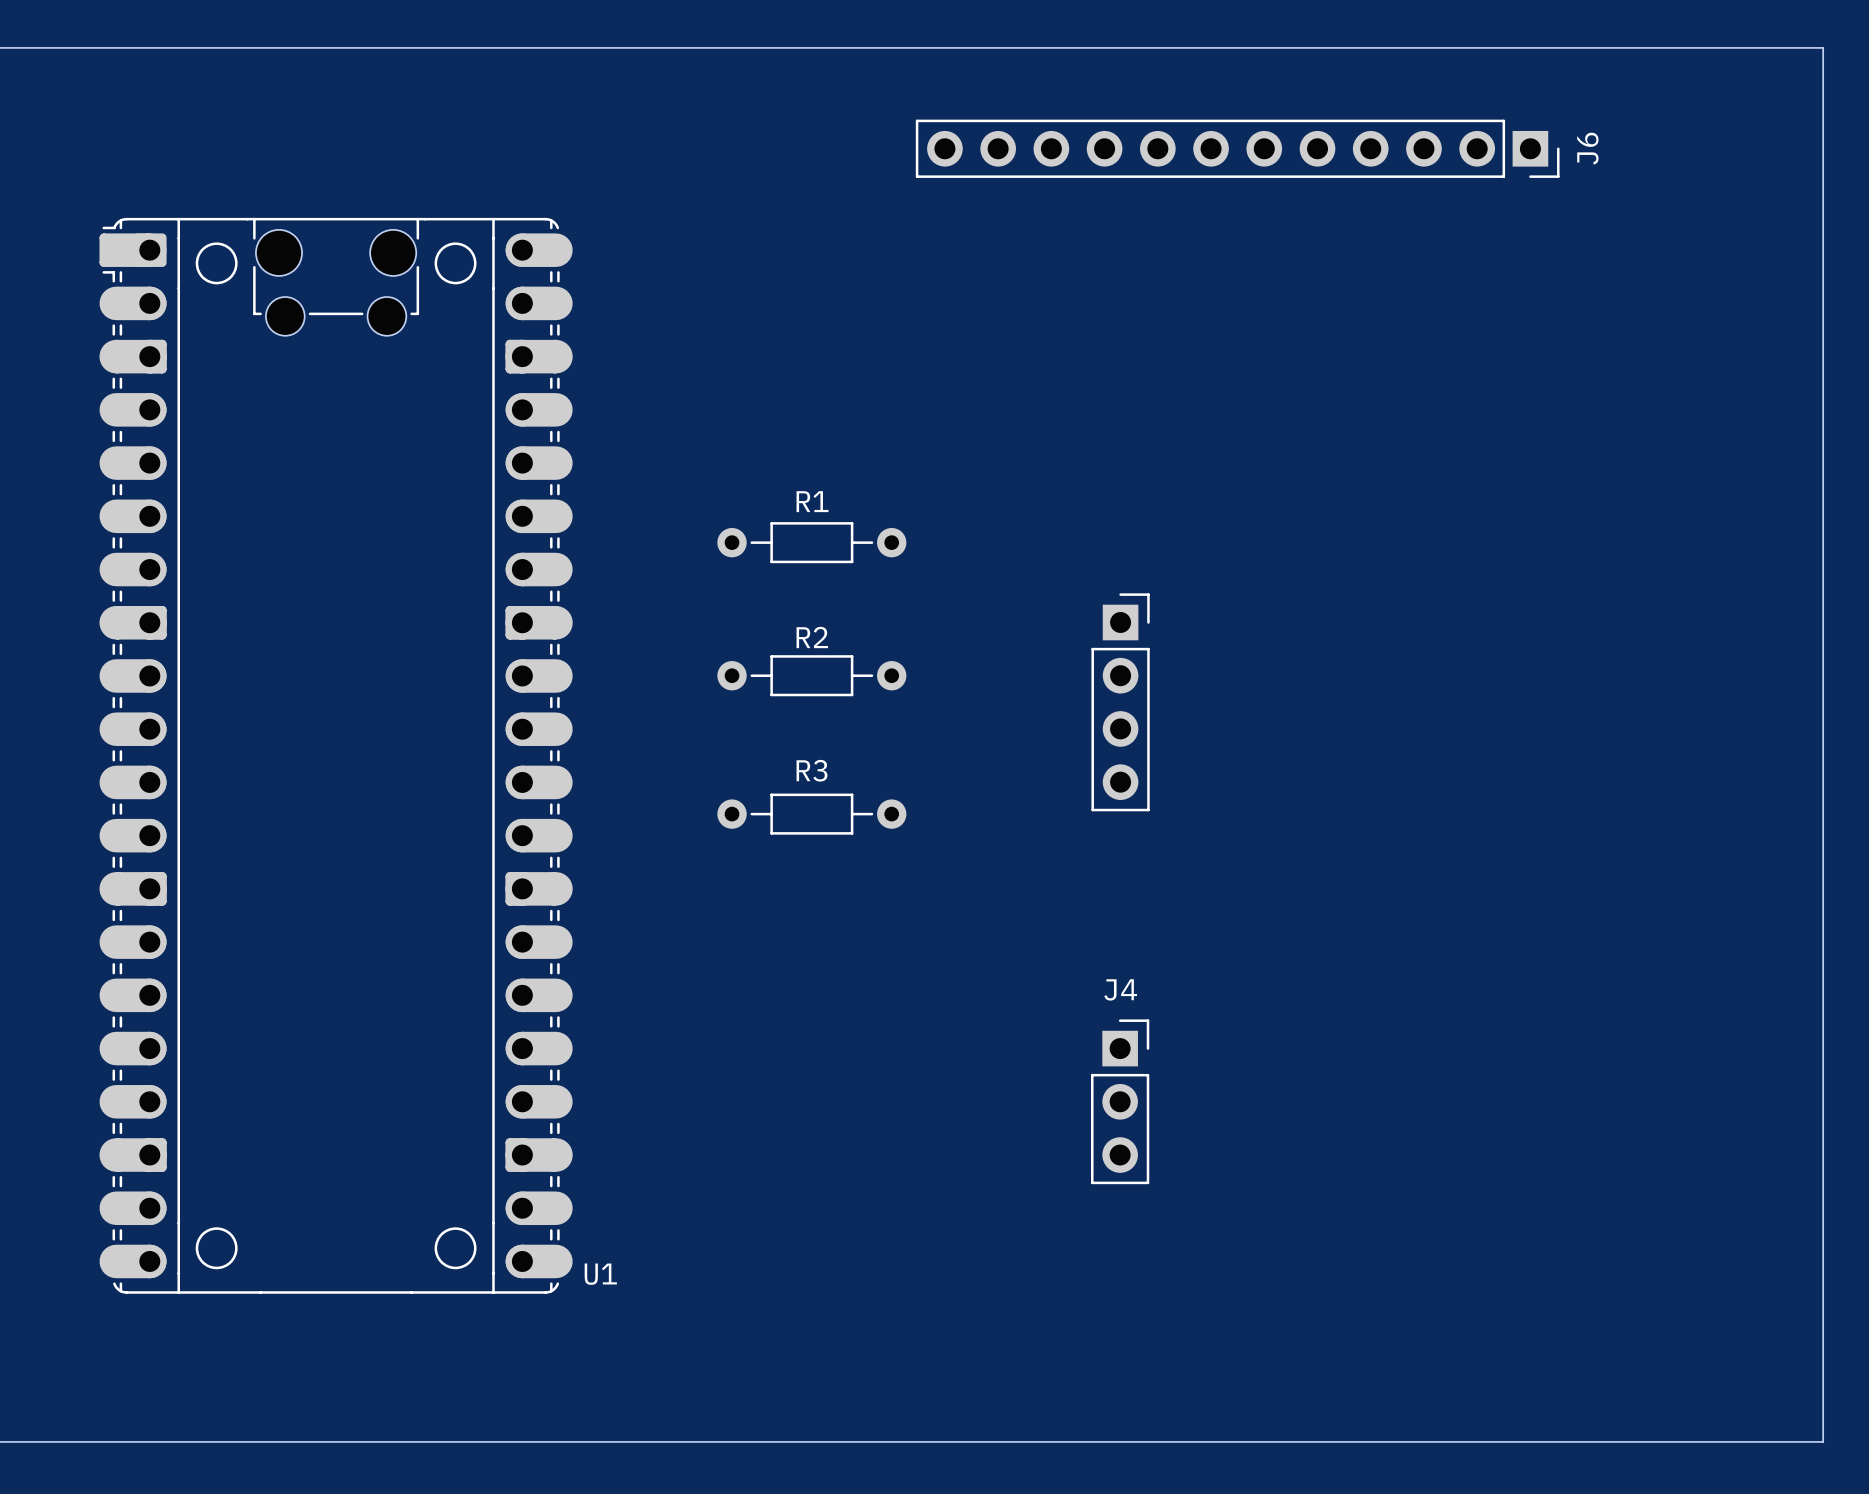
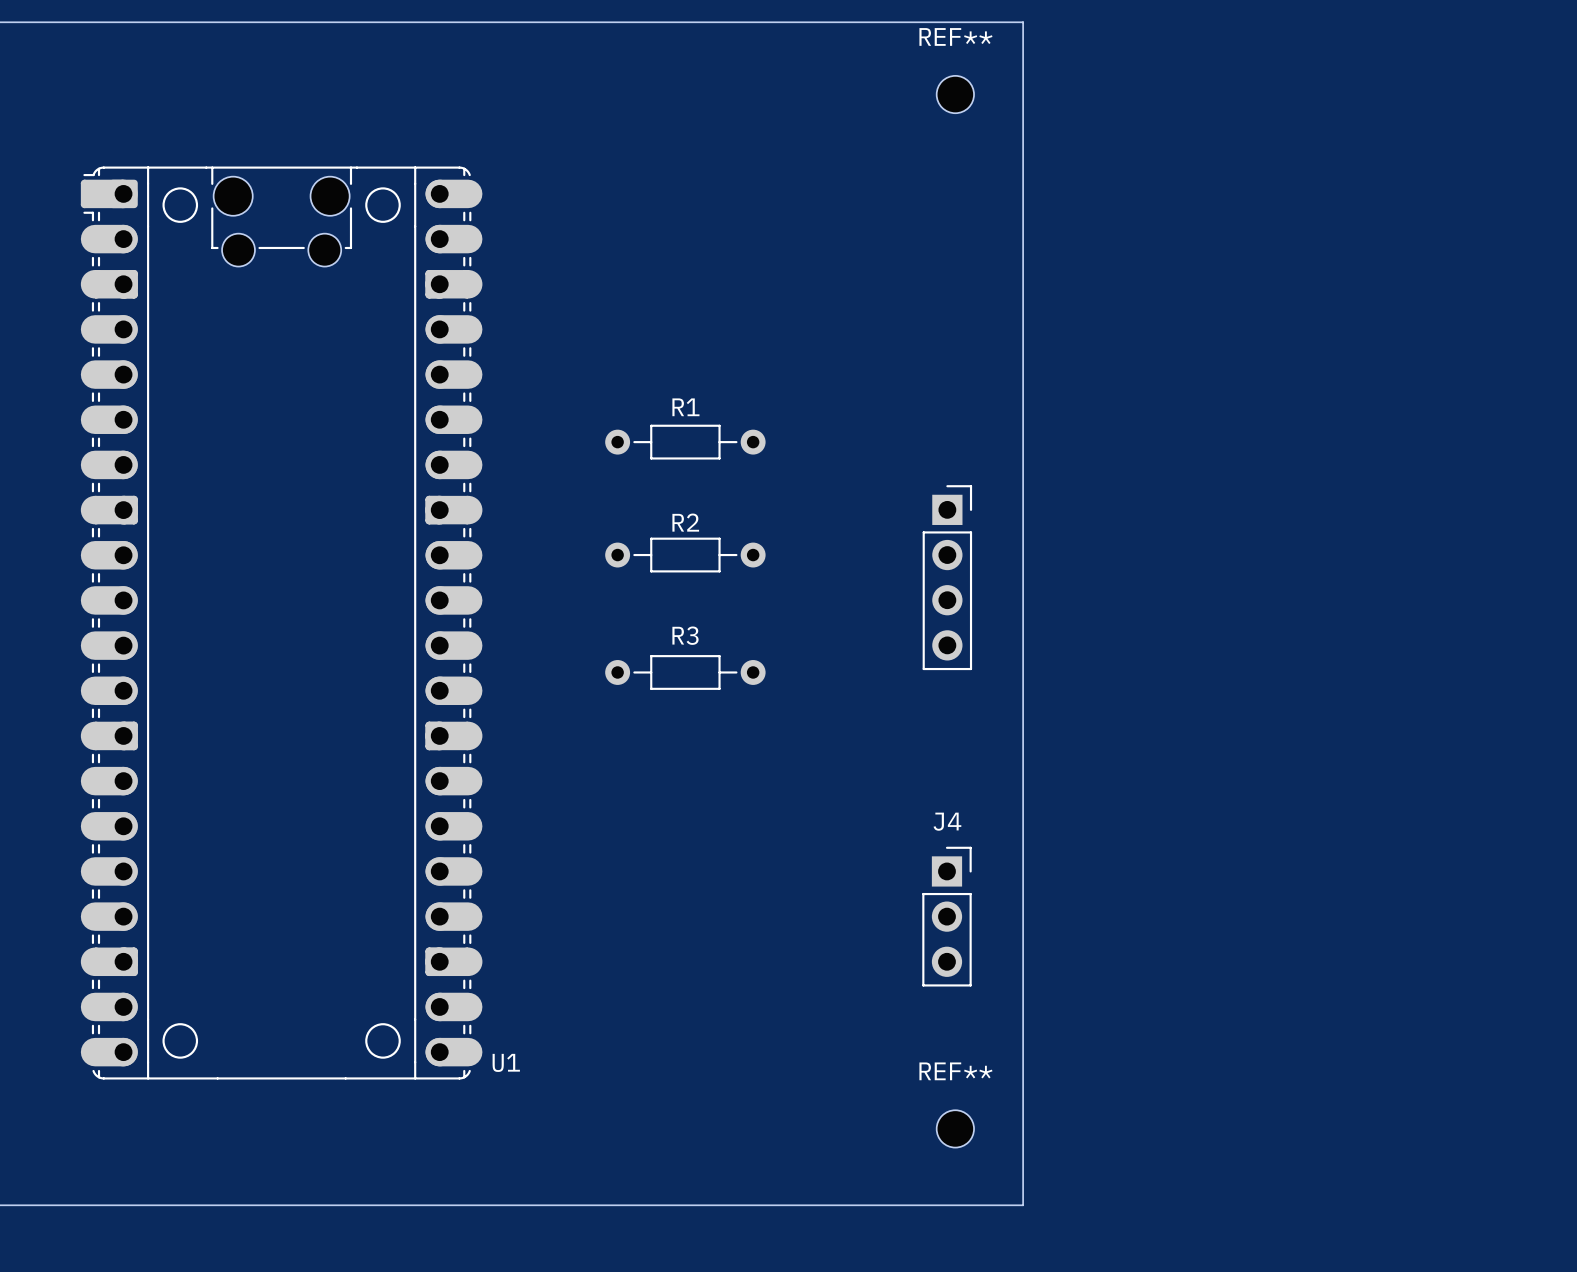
board edge: (1209, 47) (1823, 47) (1823, 1441) (1209, 1441) -> (1023, 22) (1023, 1205)
REF**: none -> (955, 94)
J6: (1237, 148) -> none
REF**: none -> (955, 1128)

